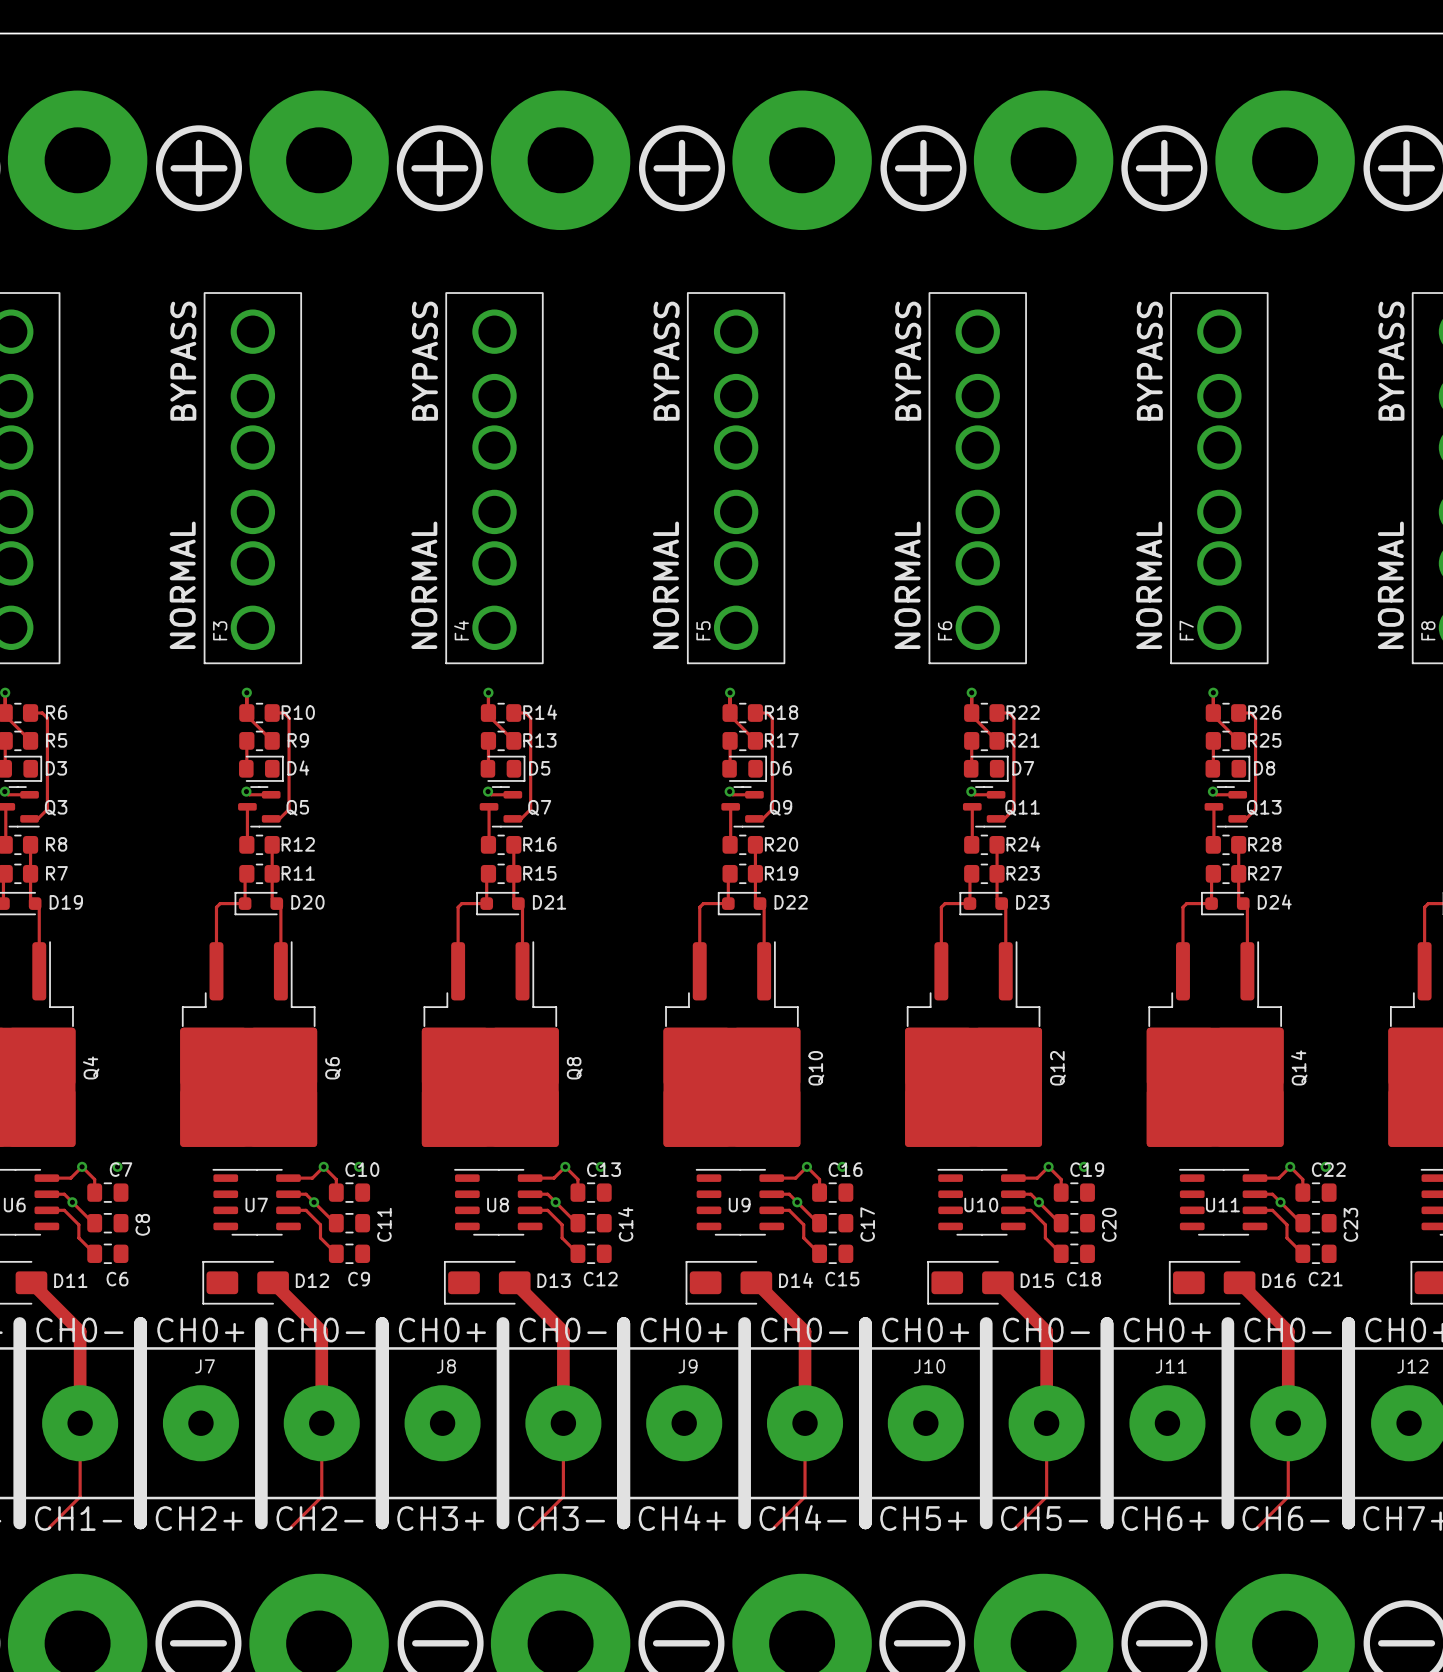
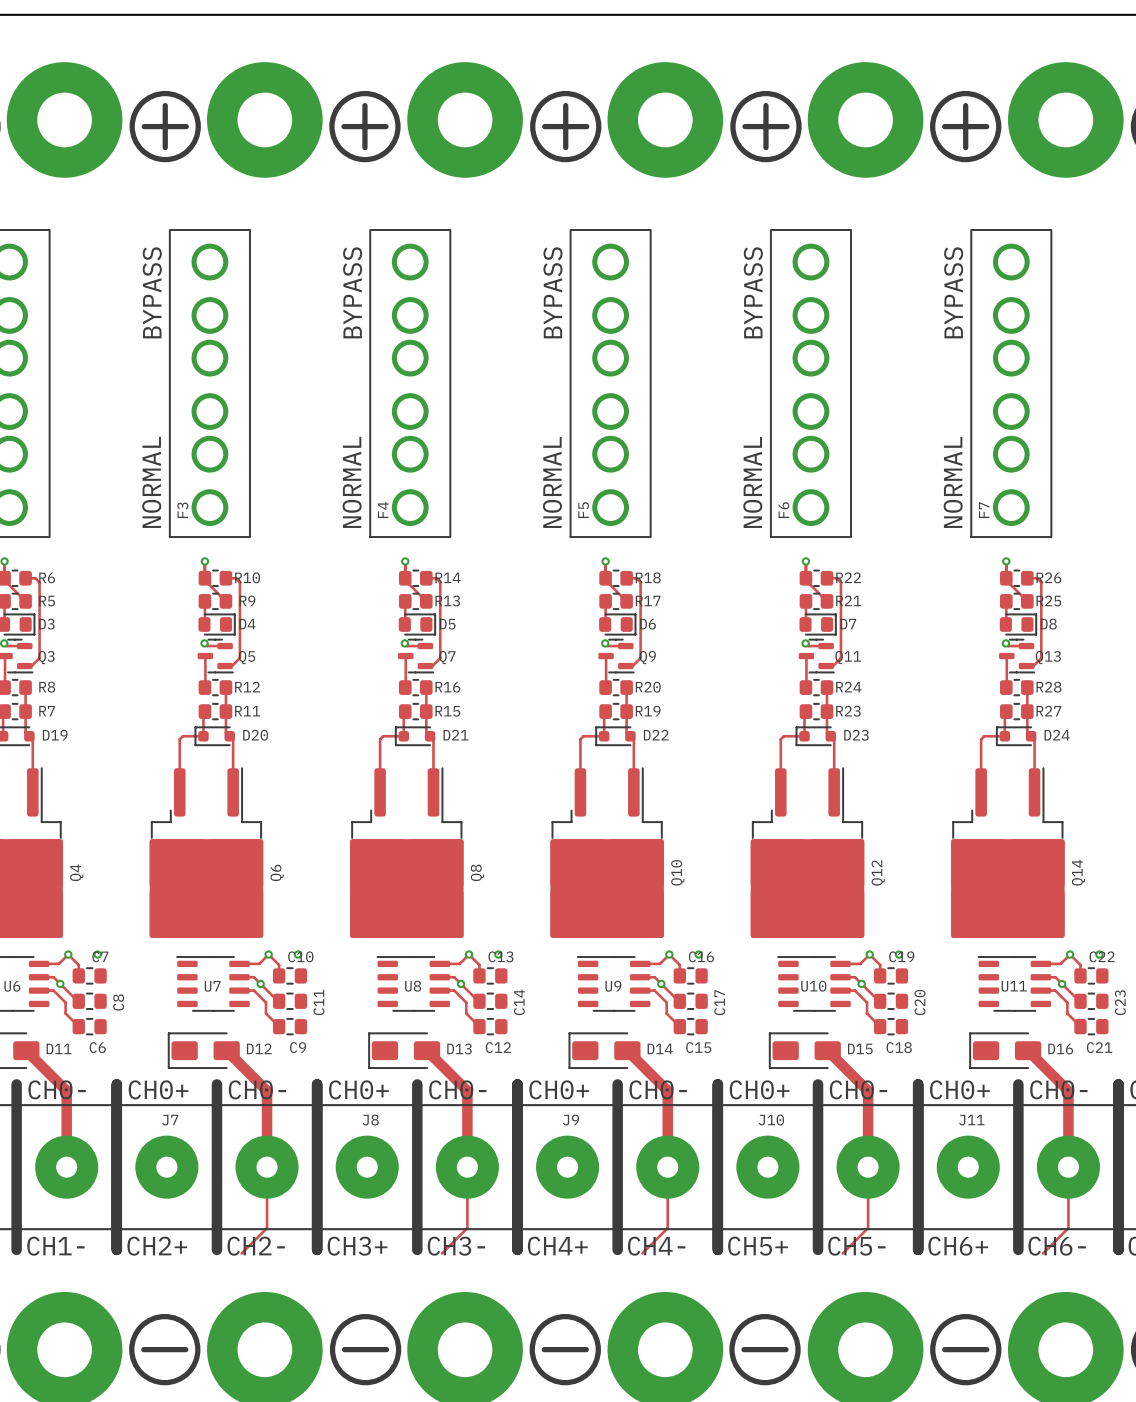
track: (80, 1423) (80, 1496) (49, 1527) -> none

